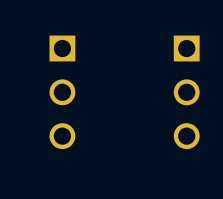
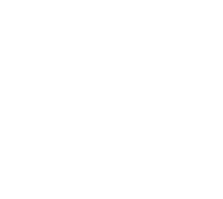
part: (62, 92) -> none
part: (186, 92) -> none

